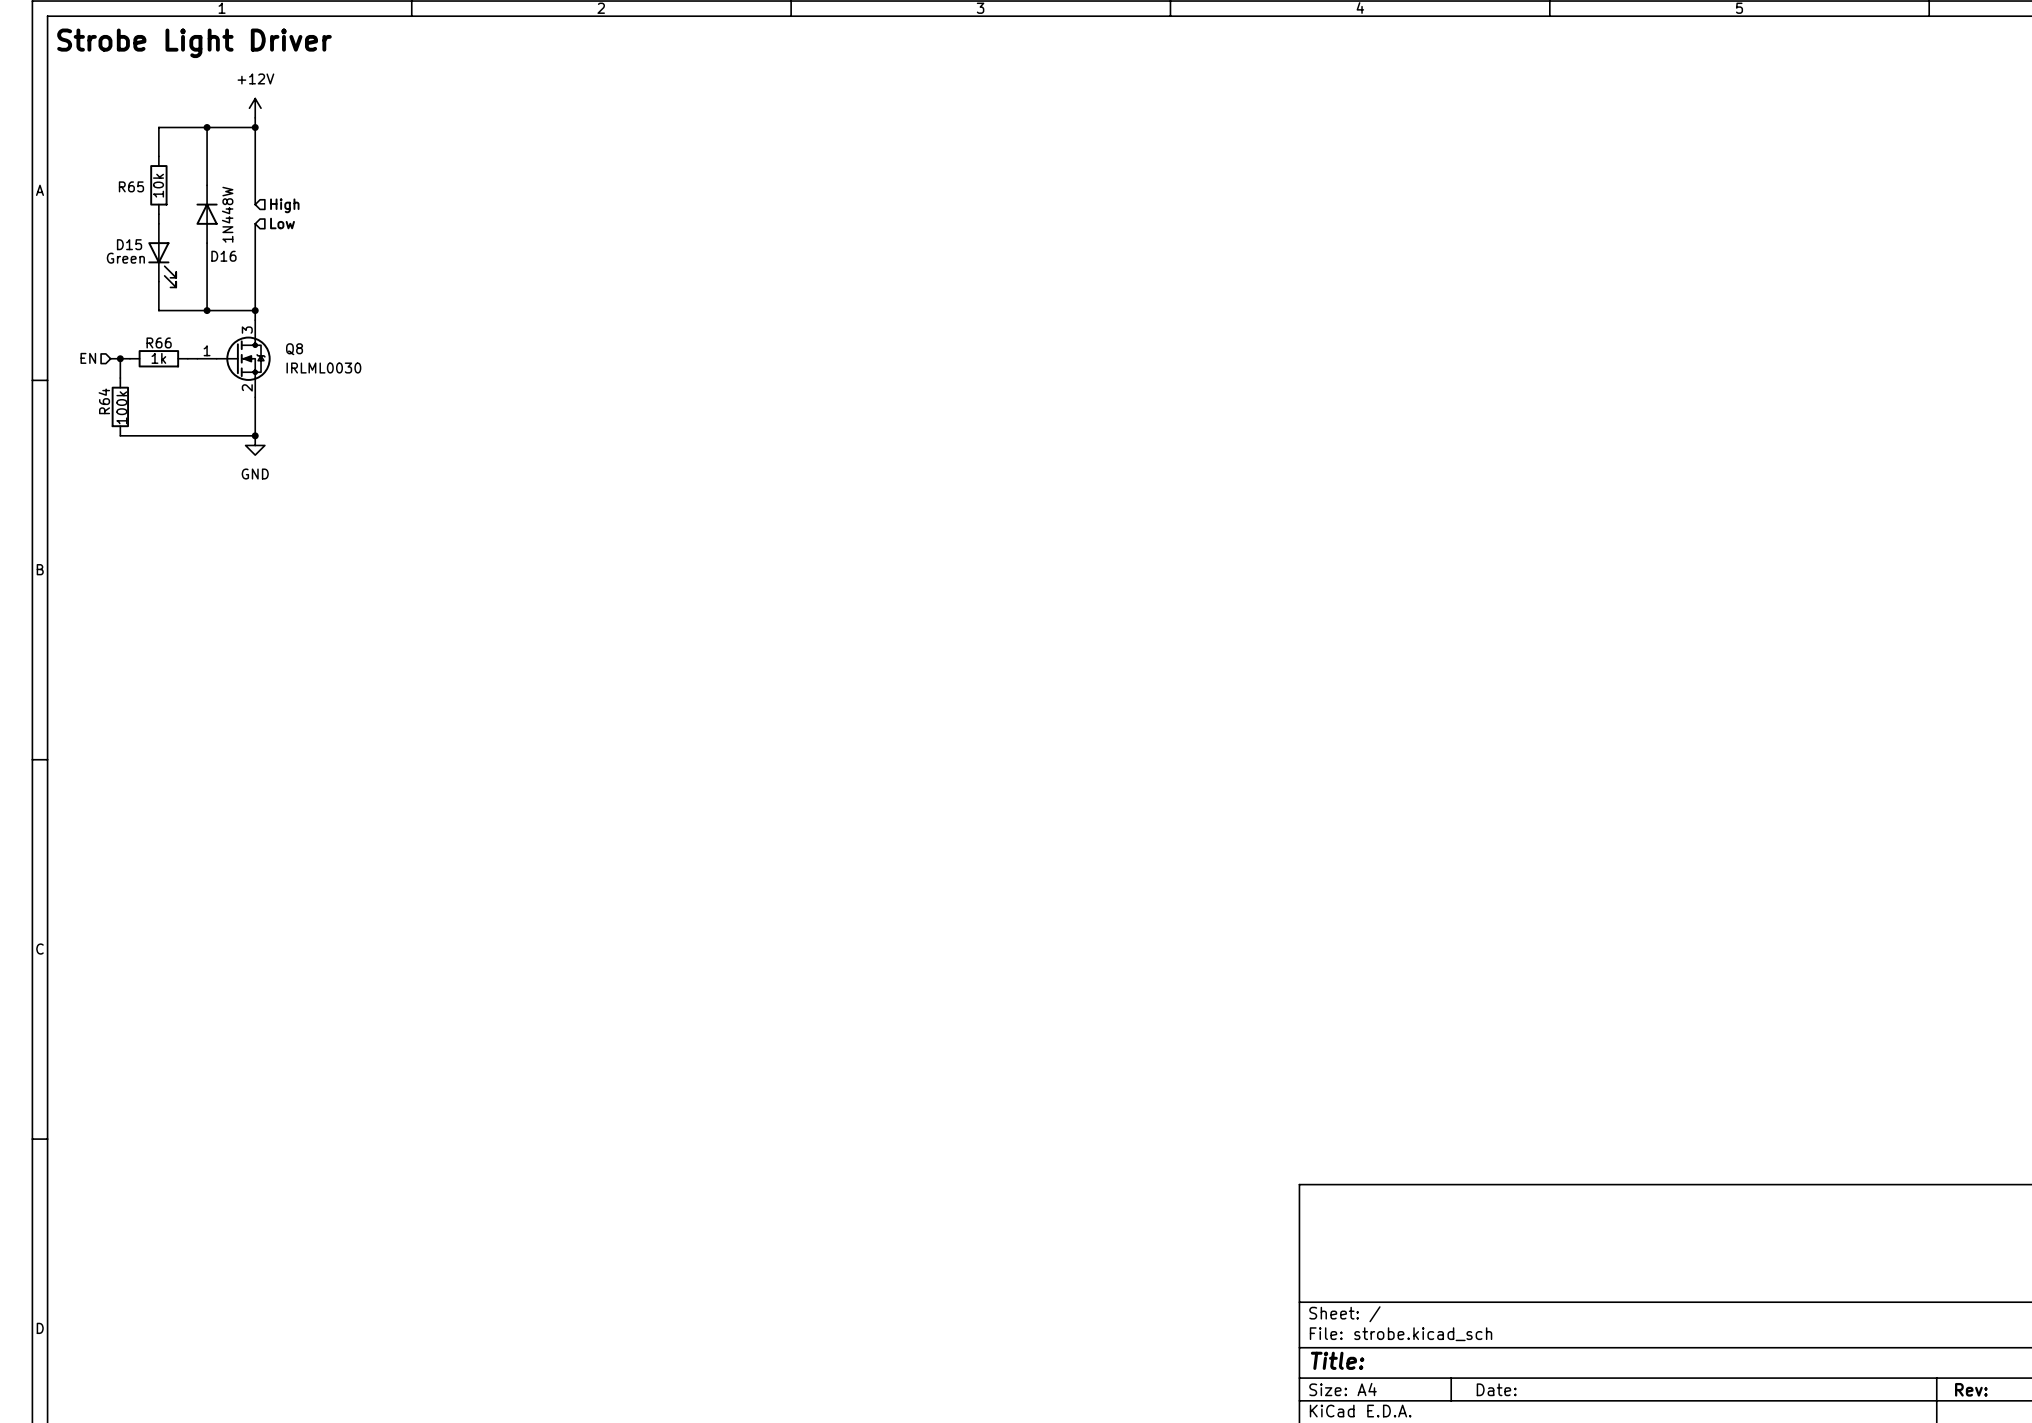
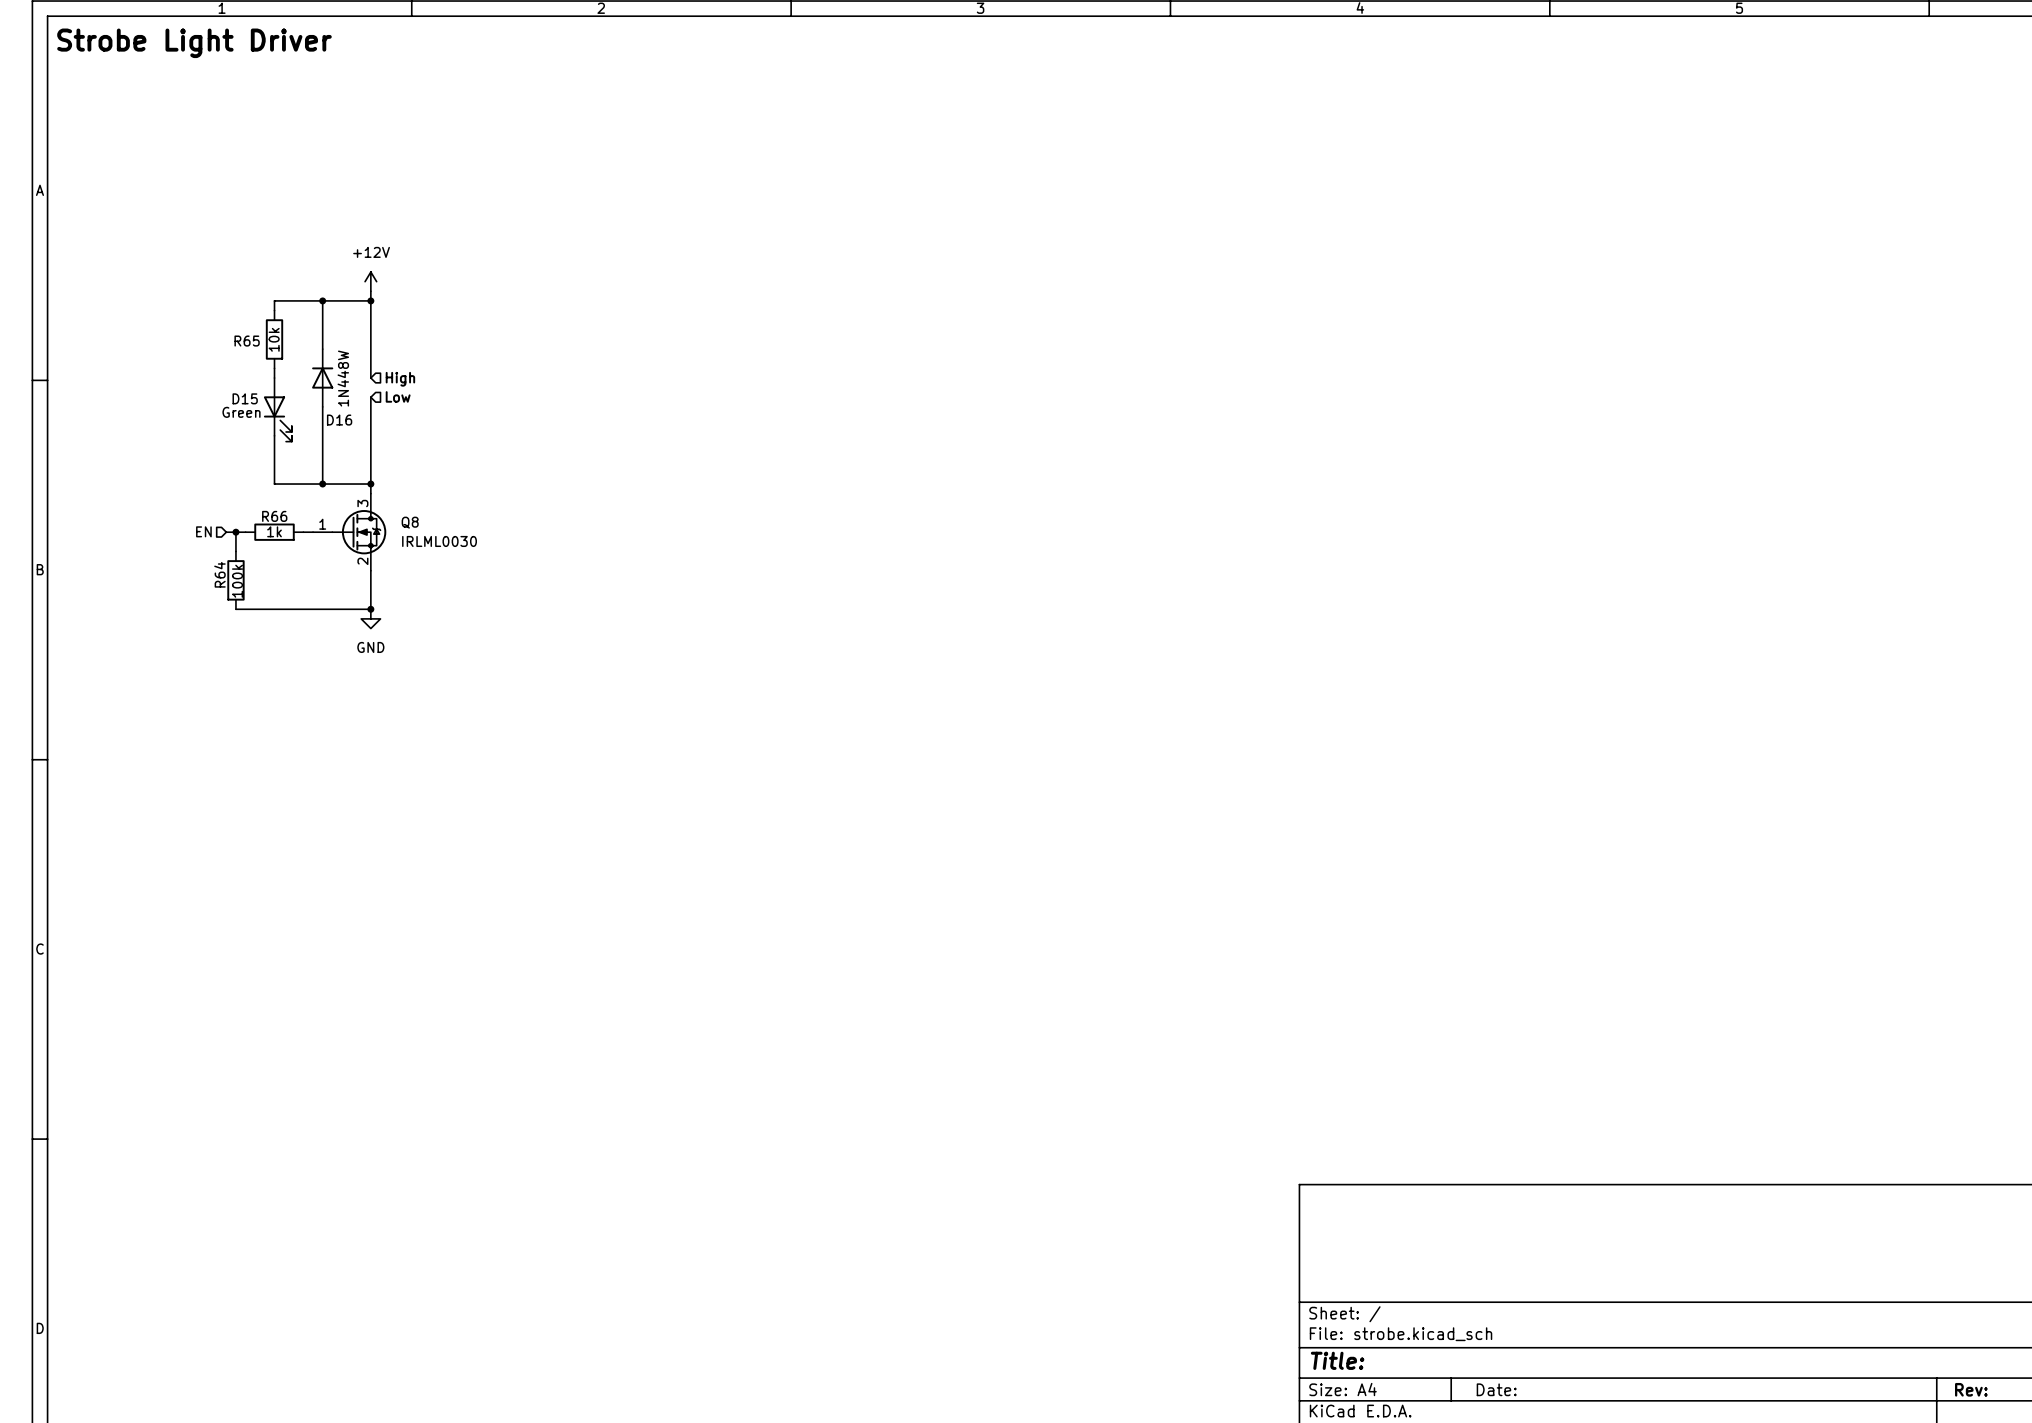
power symbol: +12V (255, 108) -> none
wire: (255, 117) (255, 204) -> none
wire: (207, 127) (207, 185) -> none
junction: (207, 127) -> none
wire: (255, 127) (158, 127) (158, 156) -> none
junction: (255, 127) -> none
R65 position: (158, 185) -> (274, 339)
hierarchical label: High (284, 205) -> none
wire: (158, 214) (158, 223) -> none
D16 position: (207, 214) -> (322, 378)
wire: (255, 223) (255, 320) -> none
hierarchical label: Low (282, 223) -> none
wire: (207, 243) (207, 310) -> none
D15 position: (162, 255) -> (277, 409)
wire: (158, 281) (158, 310) (255, 310) -> none
power symbol: none -> +12V (370, 281)
wire: none -> (370, 291) (370, 378)
wire: none -> (322, 300) (322, 349)
junction: none -> (322, 300)
wire: none -> (370, 300) (274, 300) (274, 310)
junction: none -> (370, 300)
junction: (207, 310) -> none
junction: (255, 310) -> none
hierarchical label: EN (88, 358) -> none
wire: (110, 358) (129, 358) -> none
wire: (120, 358) (120, 378) -> none
junction: (120, 358) -> none
R66 position: (158, 358) -> (274, 532)
wire: (187, 358) (197, 358) -> none
Q8 position: (234, 358) -> (349, 532)
wire: none -> (274, 368) (274, 378)
hierarchical label: none -> High (400, 379)
hierarchical label: none -> Low (398, 396)
wire: (255, 397) (255, 435) (120, 435) -> none
wire: none -> (370, 397) (370, 493)
R64 position: (120, 406) -> (235, 580)
wire: none -> (322, 406) (322, 484)
junction: (255, 435) -> none
wire: none -> (274, 435) (274, 484) (370, 484)
power symbol: GND (255, 445) -> none
junction: none -> (322, 484)
junction: none -> (370, 484)
hierarchical label: none -> EN (203, 531)
wire: none -> (226, 532) (245, 532)
wire: none -> (235, 532) (235, 551)
junction: none -> (235, 532)
wire: none -> (303, 532) (313, 532)
wire: none -> (370, 570) (370, 609) (235, 609)
junction: none -> (370, 609)
power symbol: none -> GND (370, 618)

